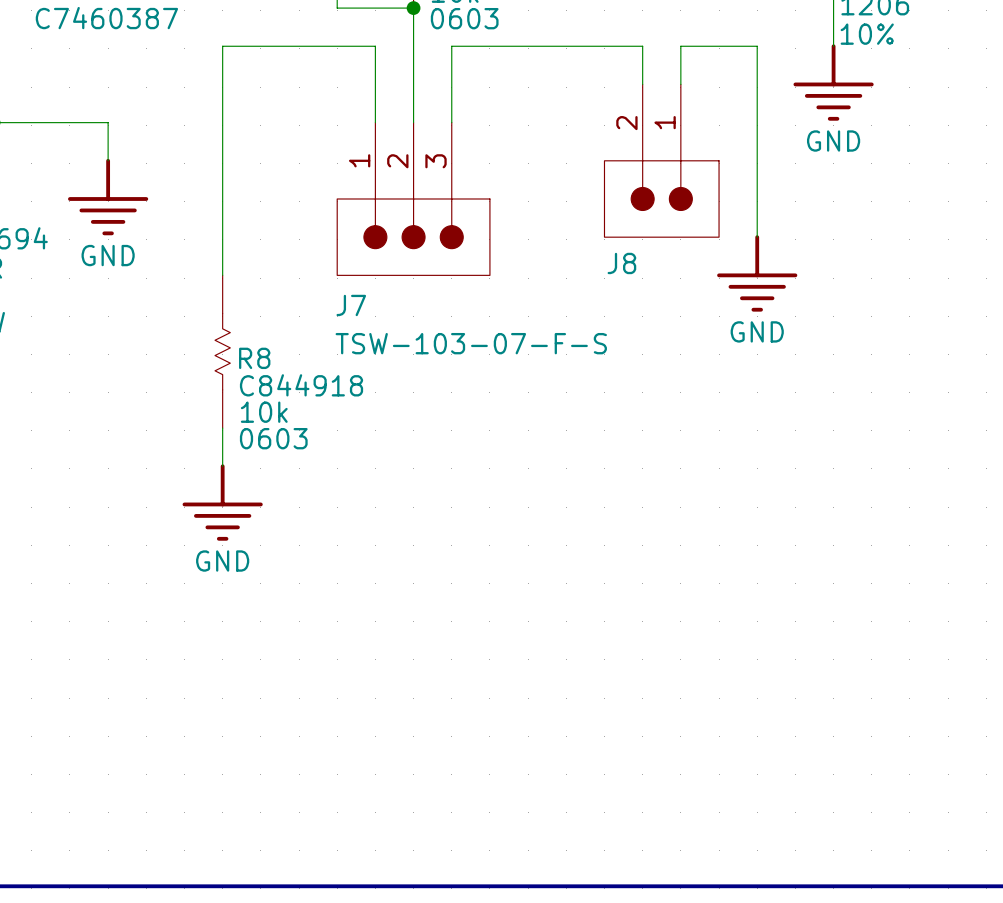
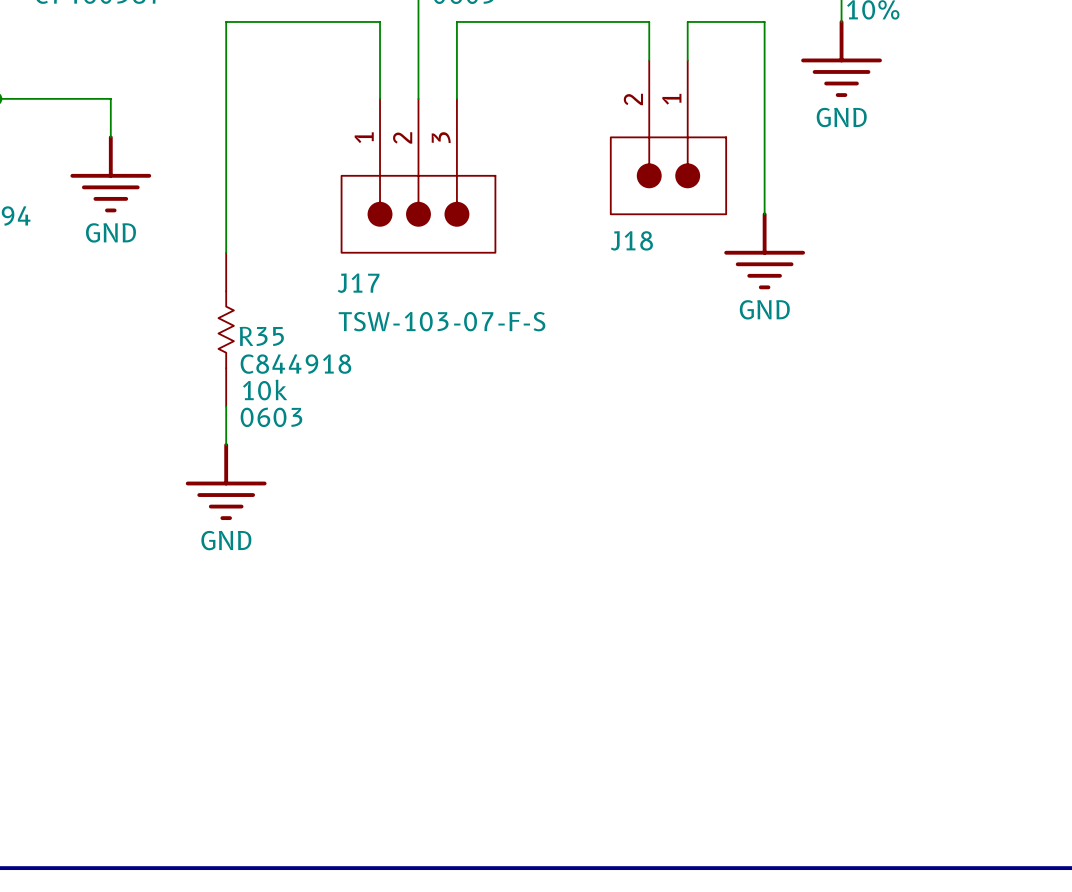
J8 name: J8 (621, 263) -> J18 (631, 240)
J7 name: J7 (351, 305) -> J17 (358, 283)
R8 name: R8 (254, 358) -> R35 (261, 336)

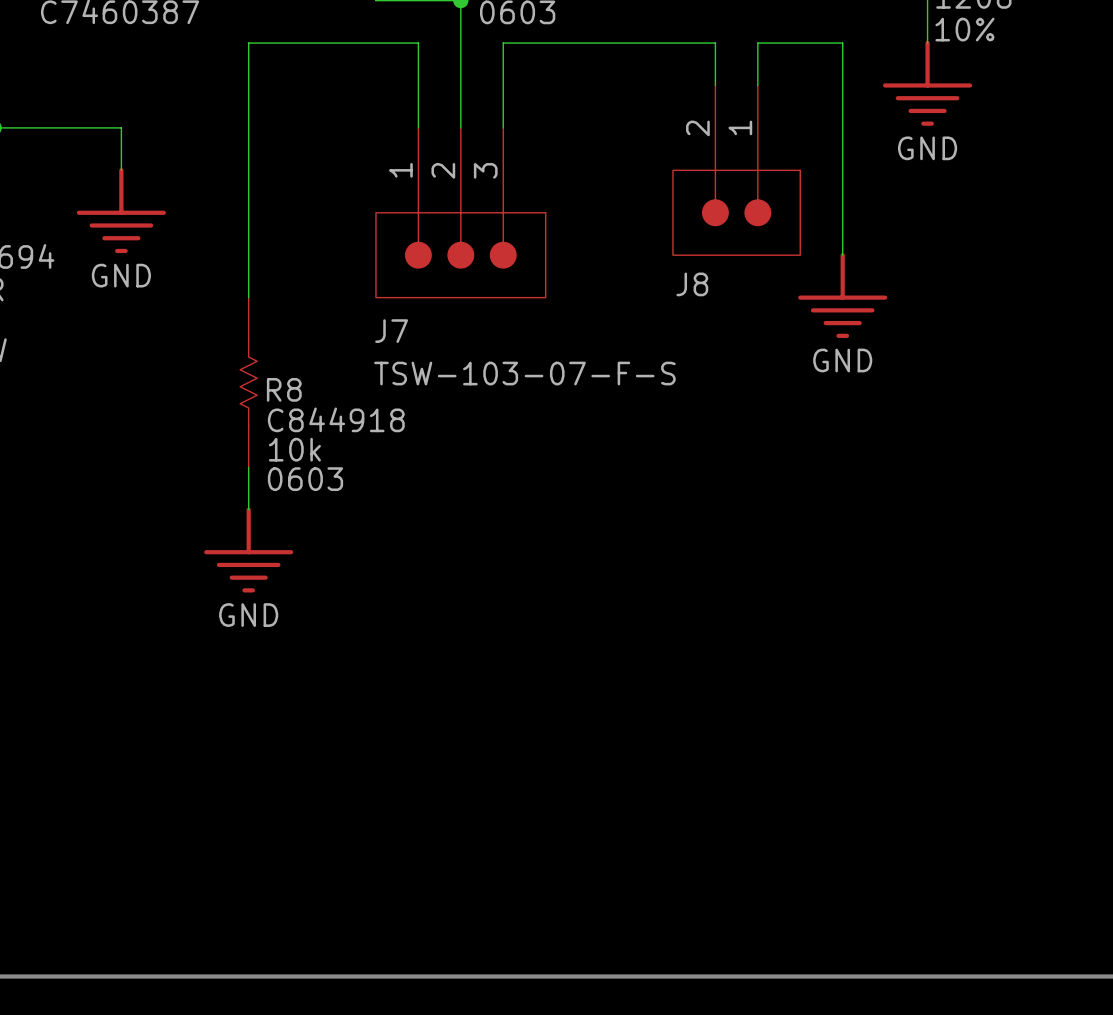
J18 name: J18 (631, 240) -> J8 (692, 284)
J17 name: J17 (358, 283) -> J7 (391, 331)
R35 name: R35 (261, 336) -> R8 (284, 389)

